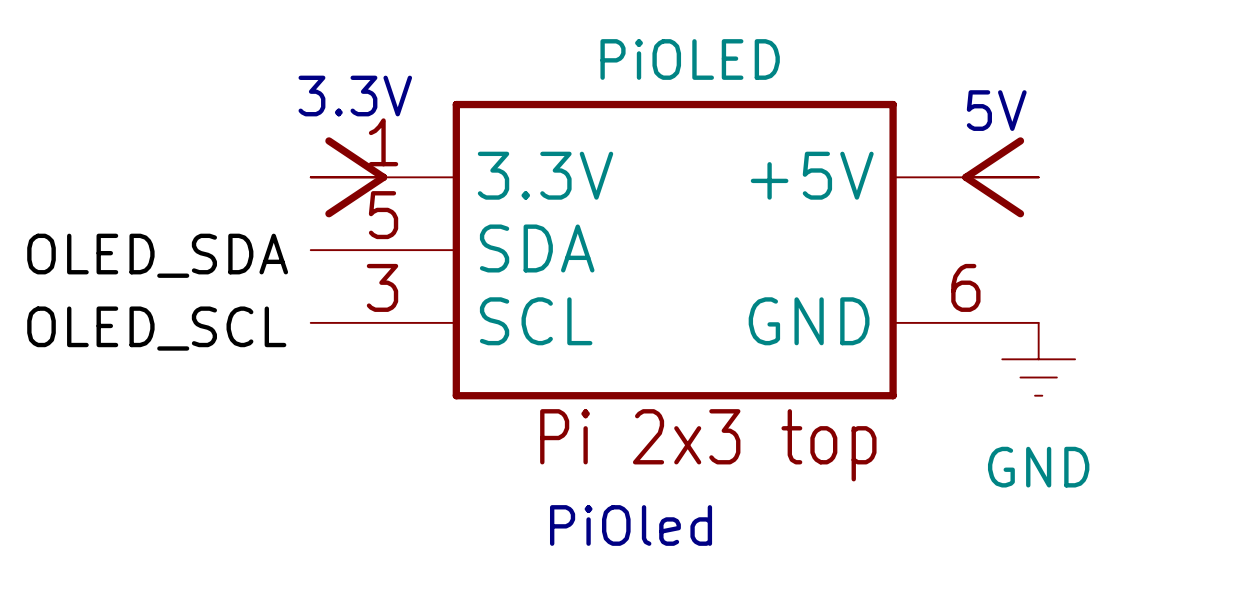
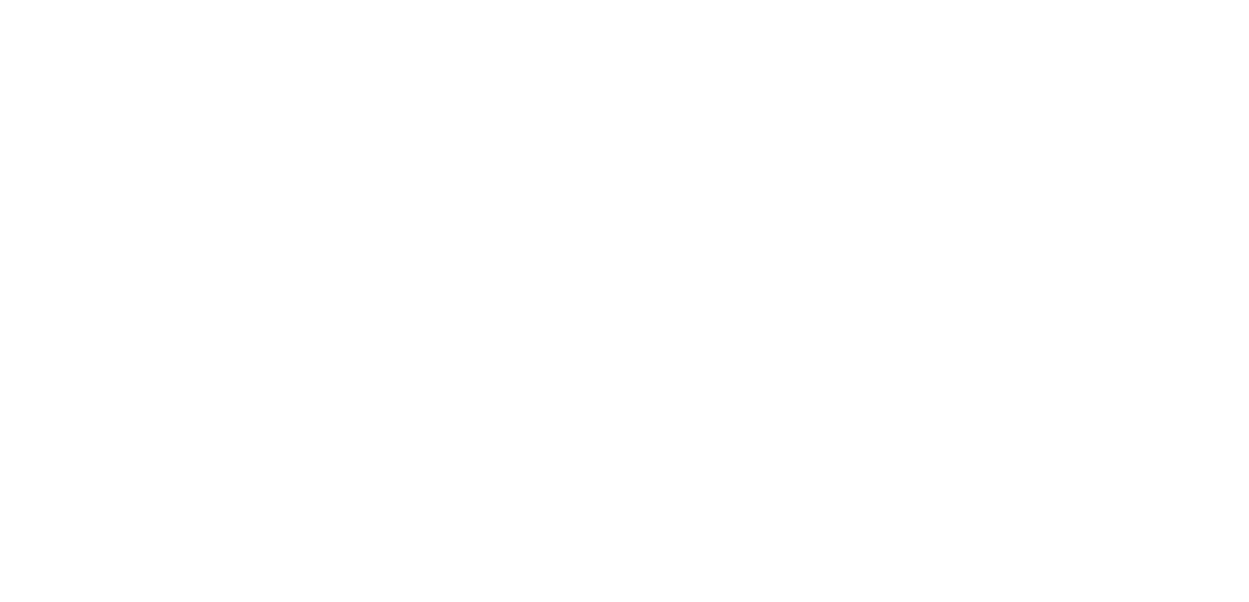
text: 3.3V (355, 96) -> none
text: 5V (996, 110) -> none
power symbol: (348, 177) -> none
power symbol: (1000, 177) -> none
PiOLED: (674, 250) -> none
label: OLED_SDA (157, 255) -> none
label: OLED_SCL (156, 328) -> none
power symbol: GND (1038, 359) -> none
text: PiOled (631, 525) -> none

